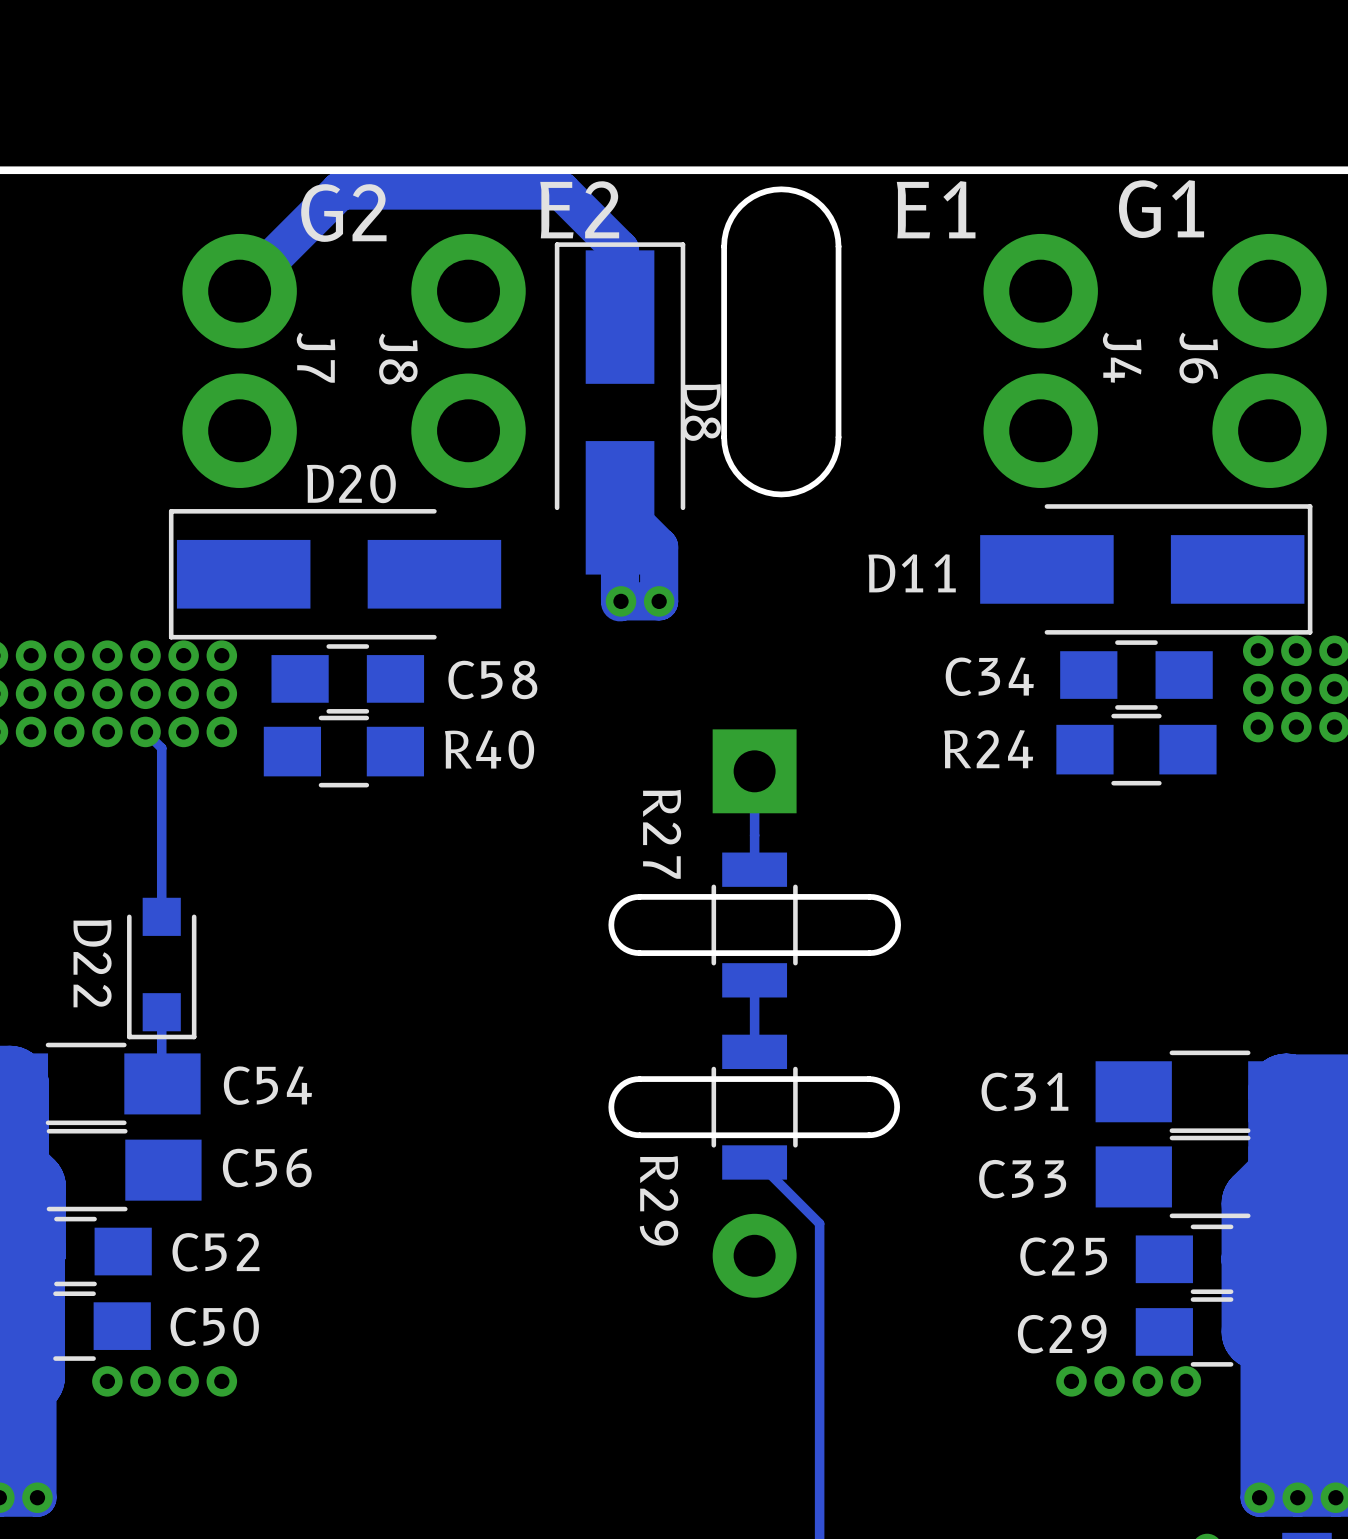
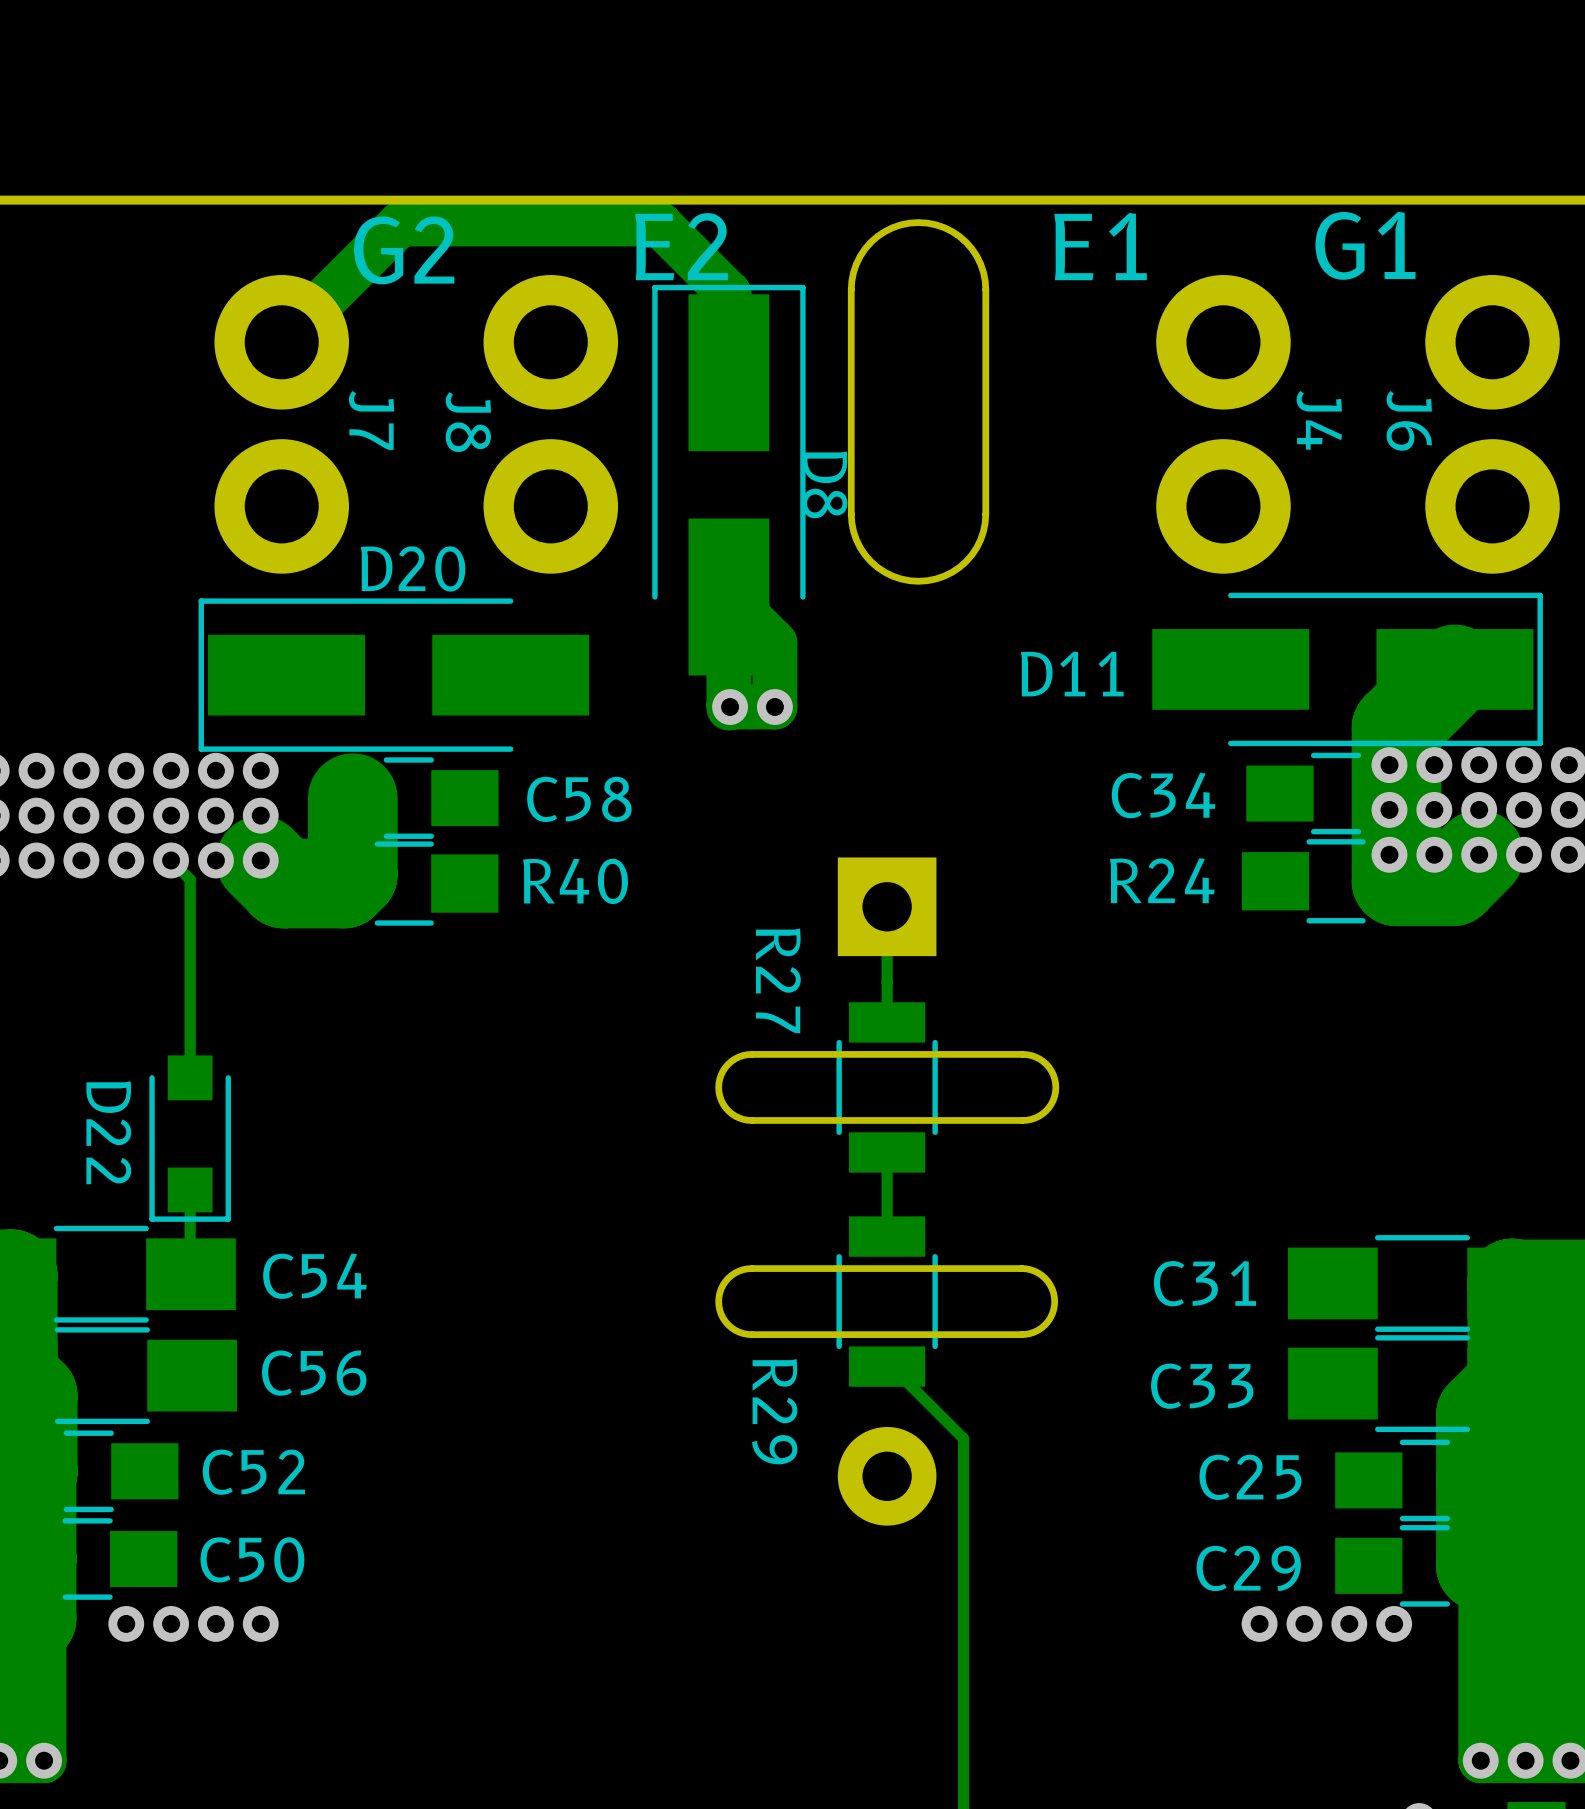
track: none -> (1454, 669) (1396, 727) (1396, 881) (1452, 881) (1479, 854)
via: none -> (1389, 765)
via: none -> (1434, 765)
track: none -> (352, 798) (352, 874) (343, 883) (283, 883) (260, 860)
via: none -> (1389, 809)
via: none -> (1434, 809)
via: none -> (1389, 854)
via: none -> (1434, 854)

